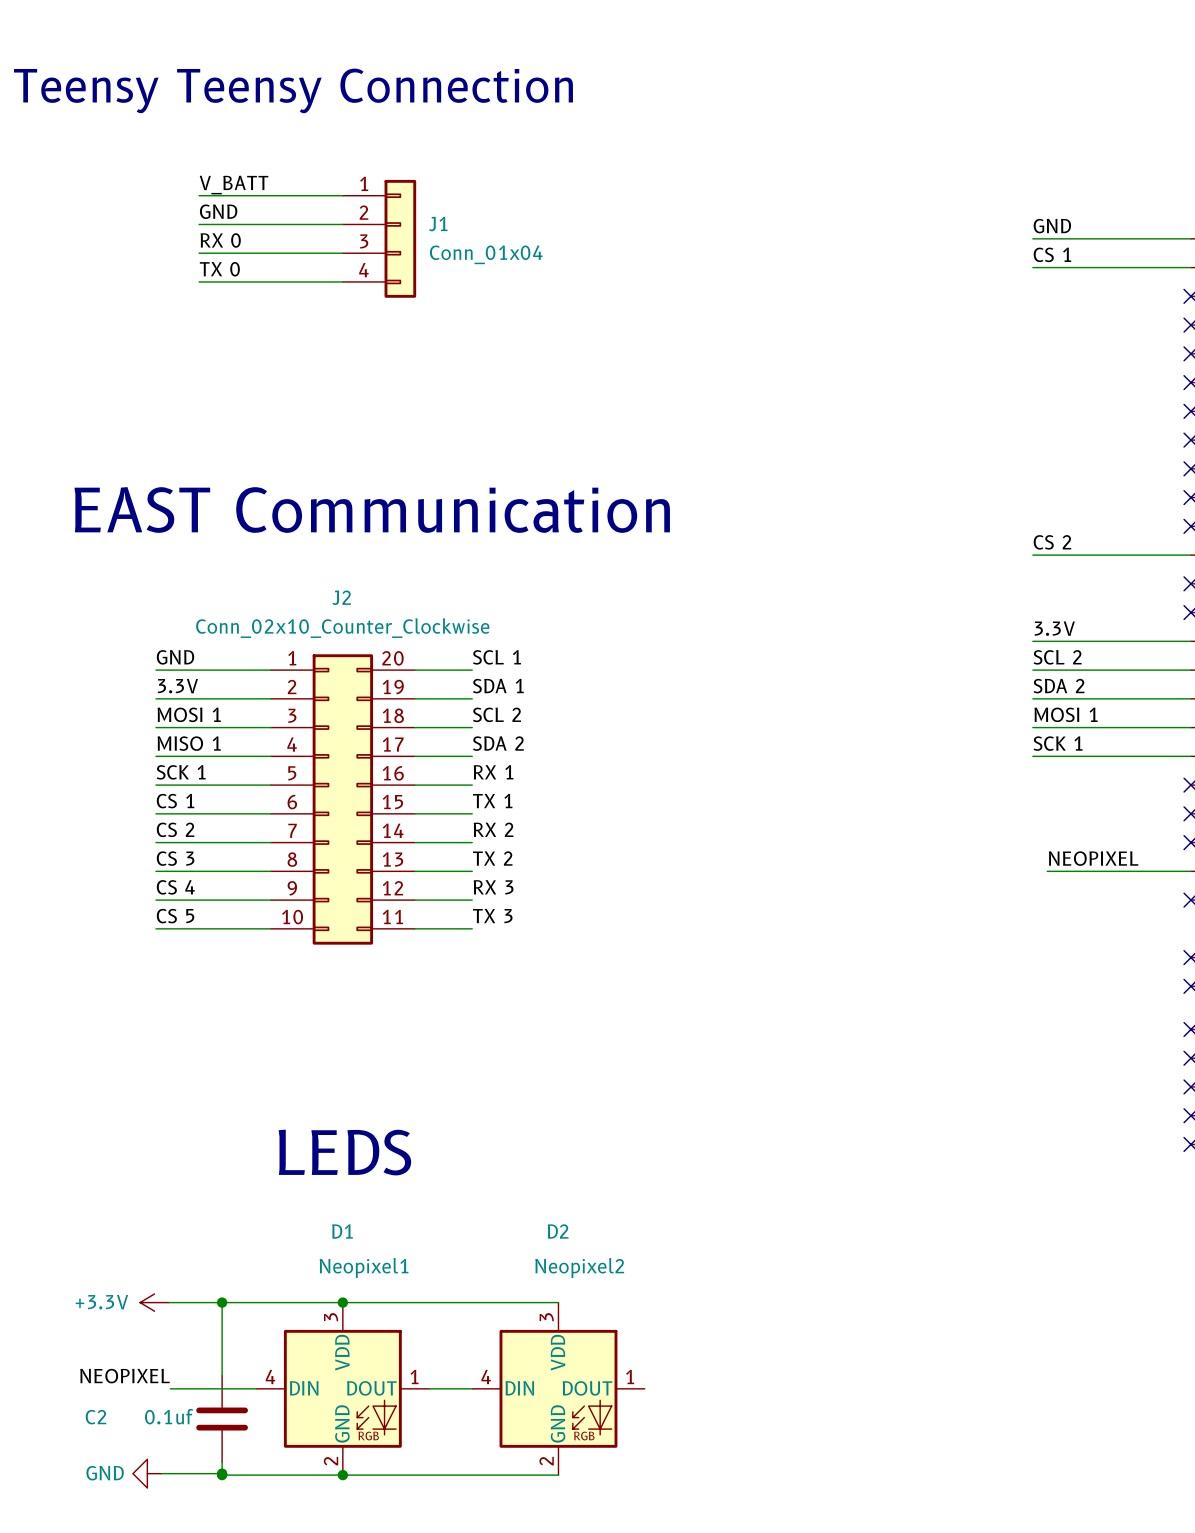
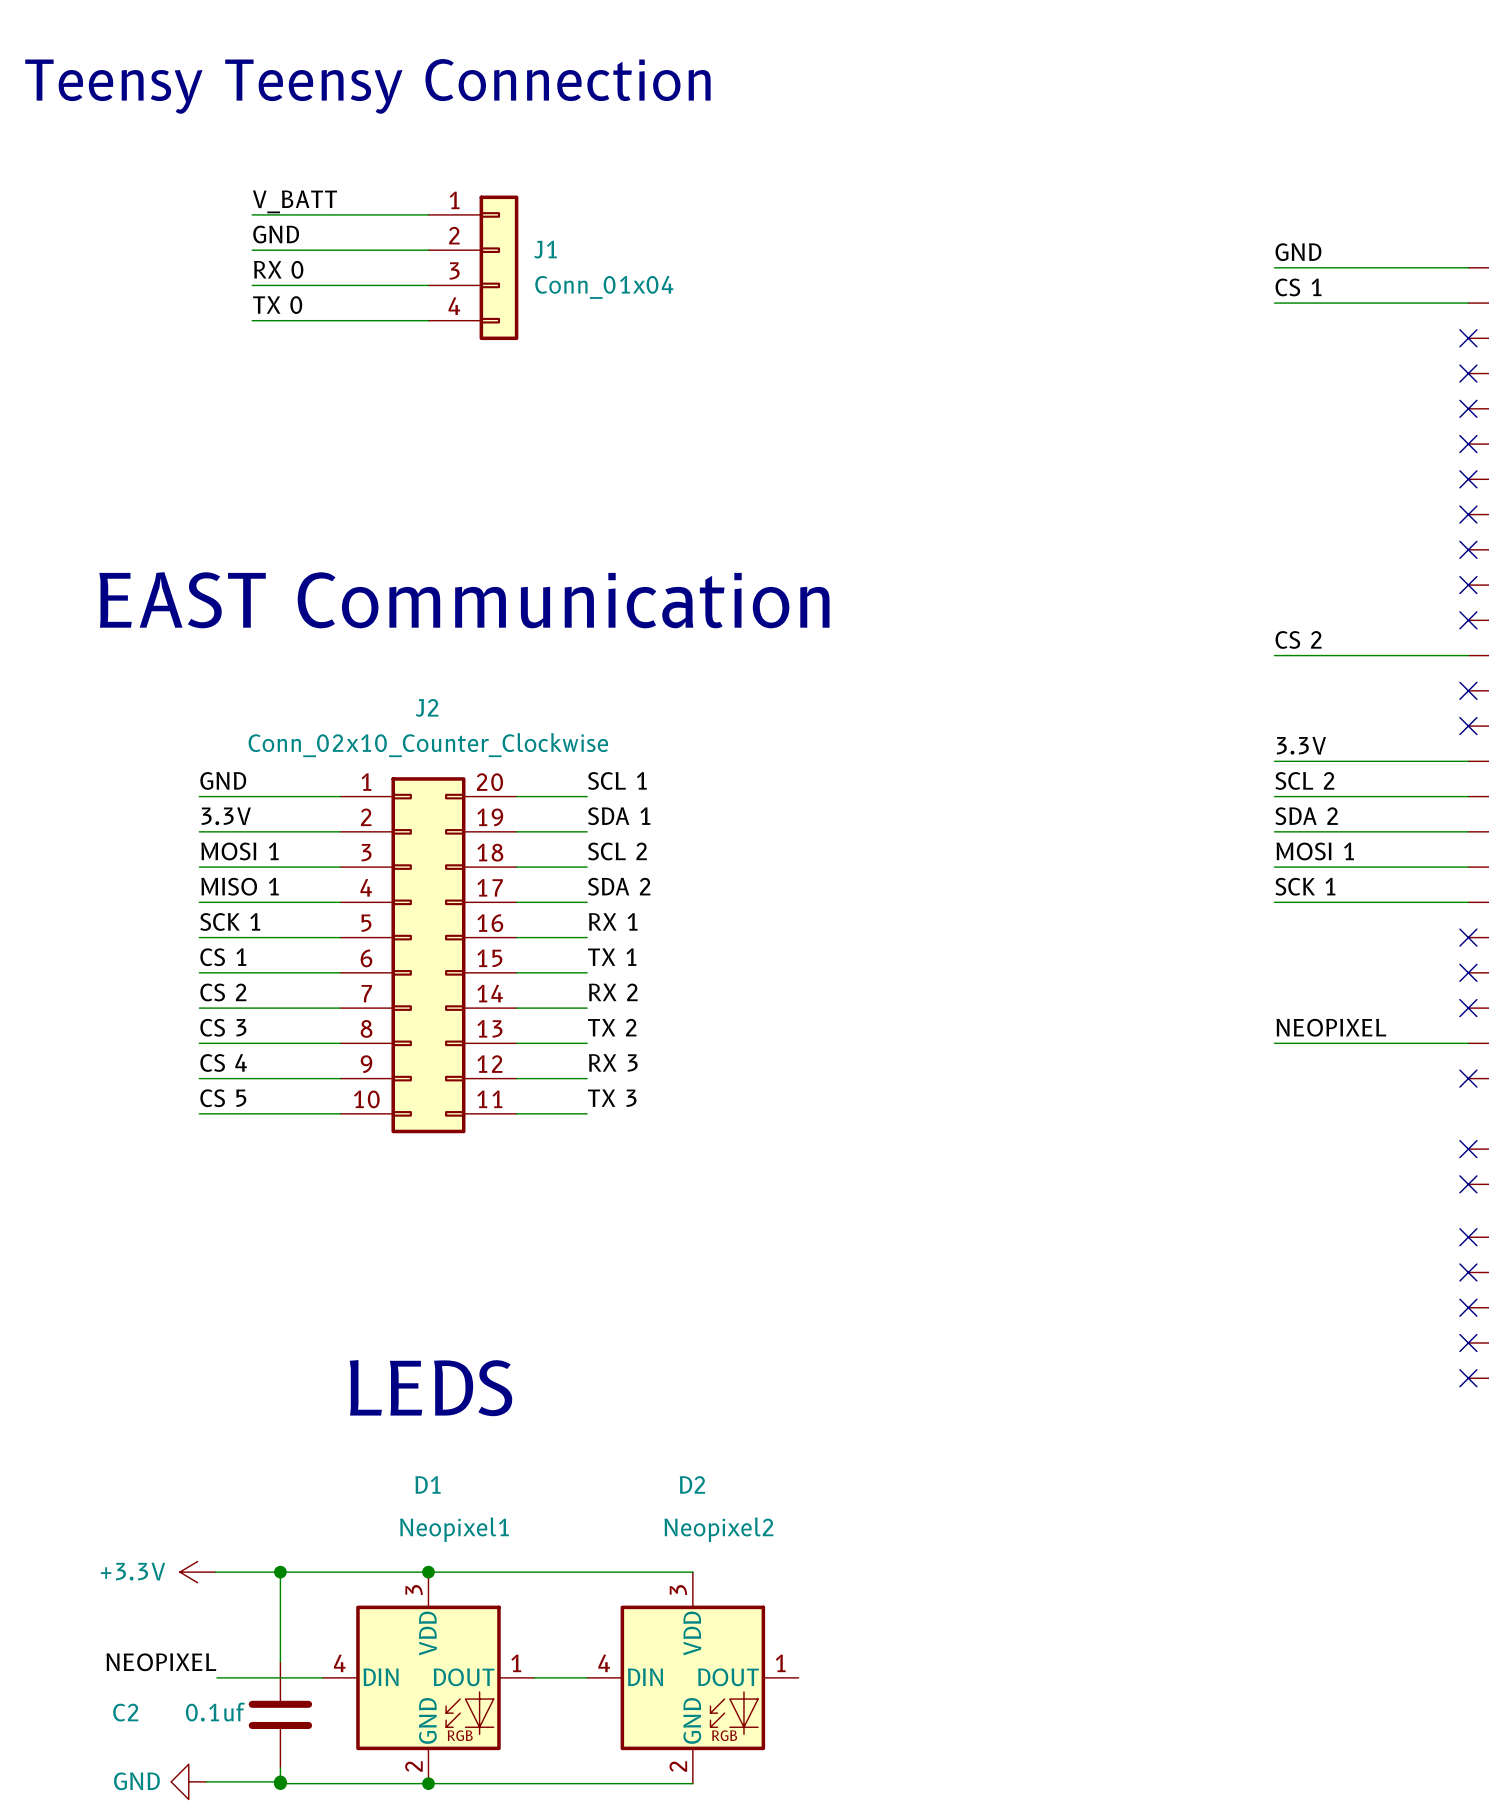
label position: NEOPIXEL (1093, 858) -> NEOPIXEL (1331, 1027)
wire: none -> (1274, 1043) (1292, 1043)

